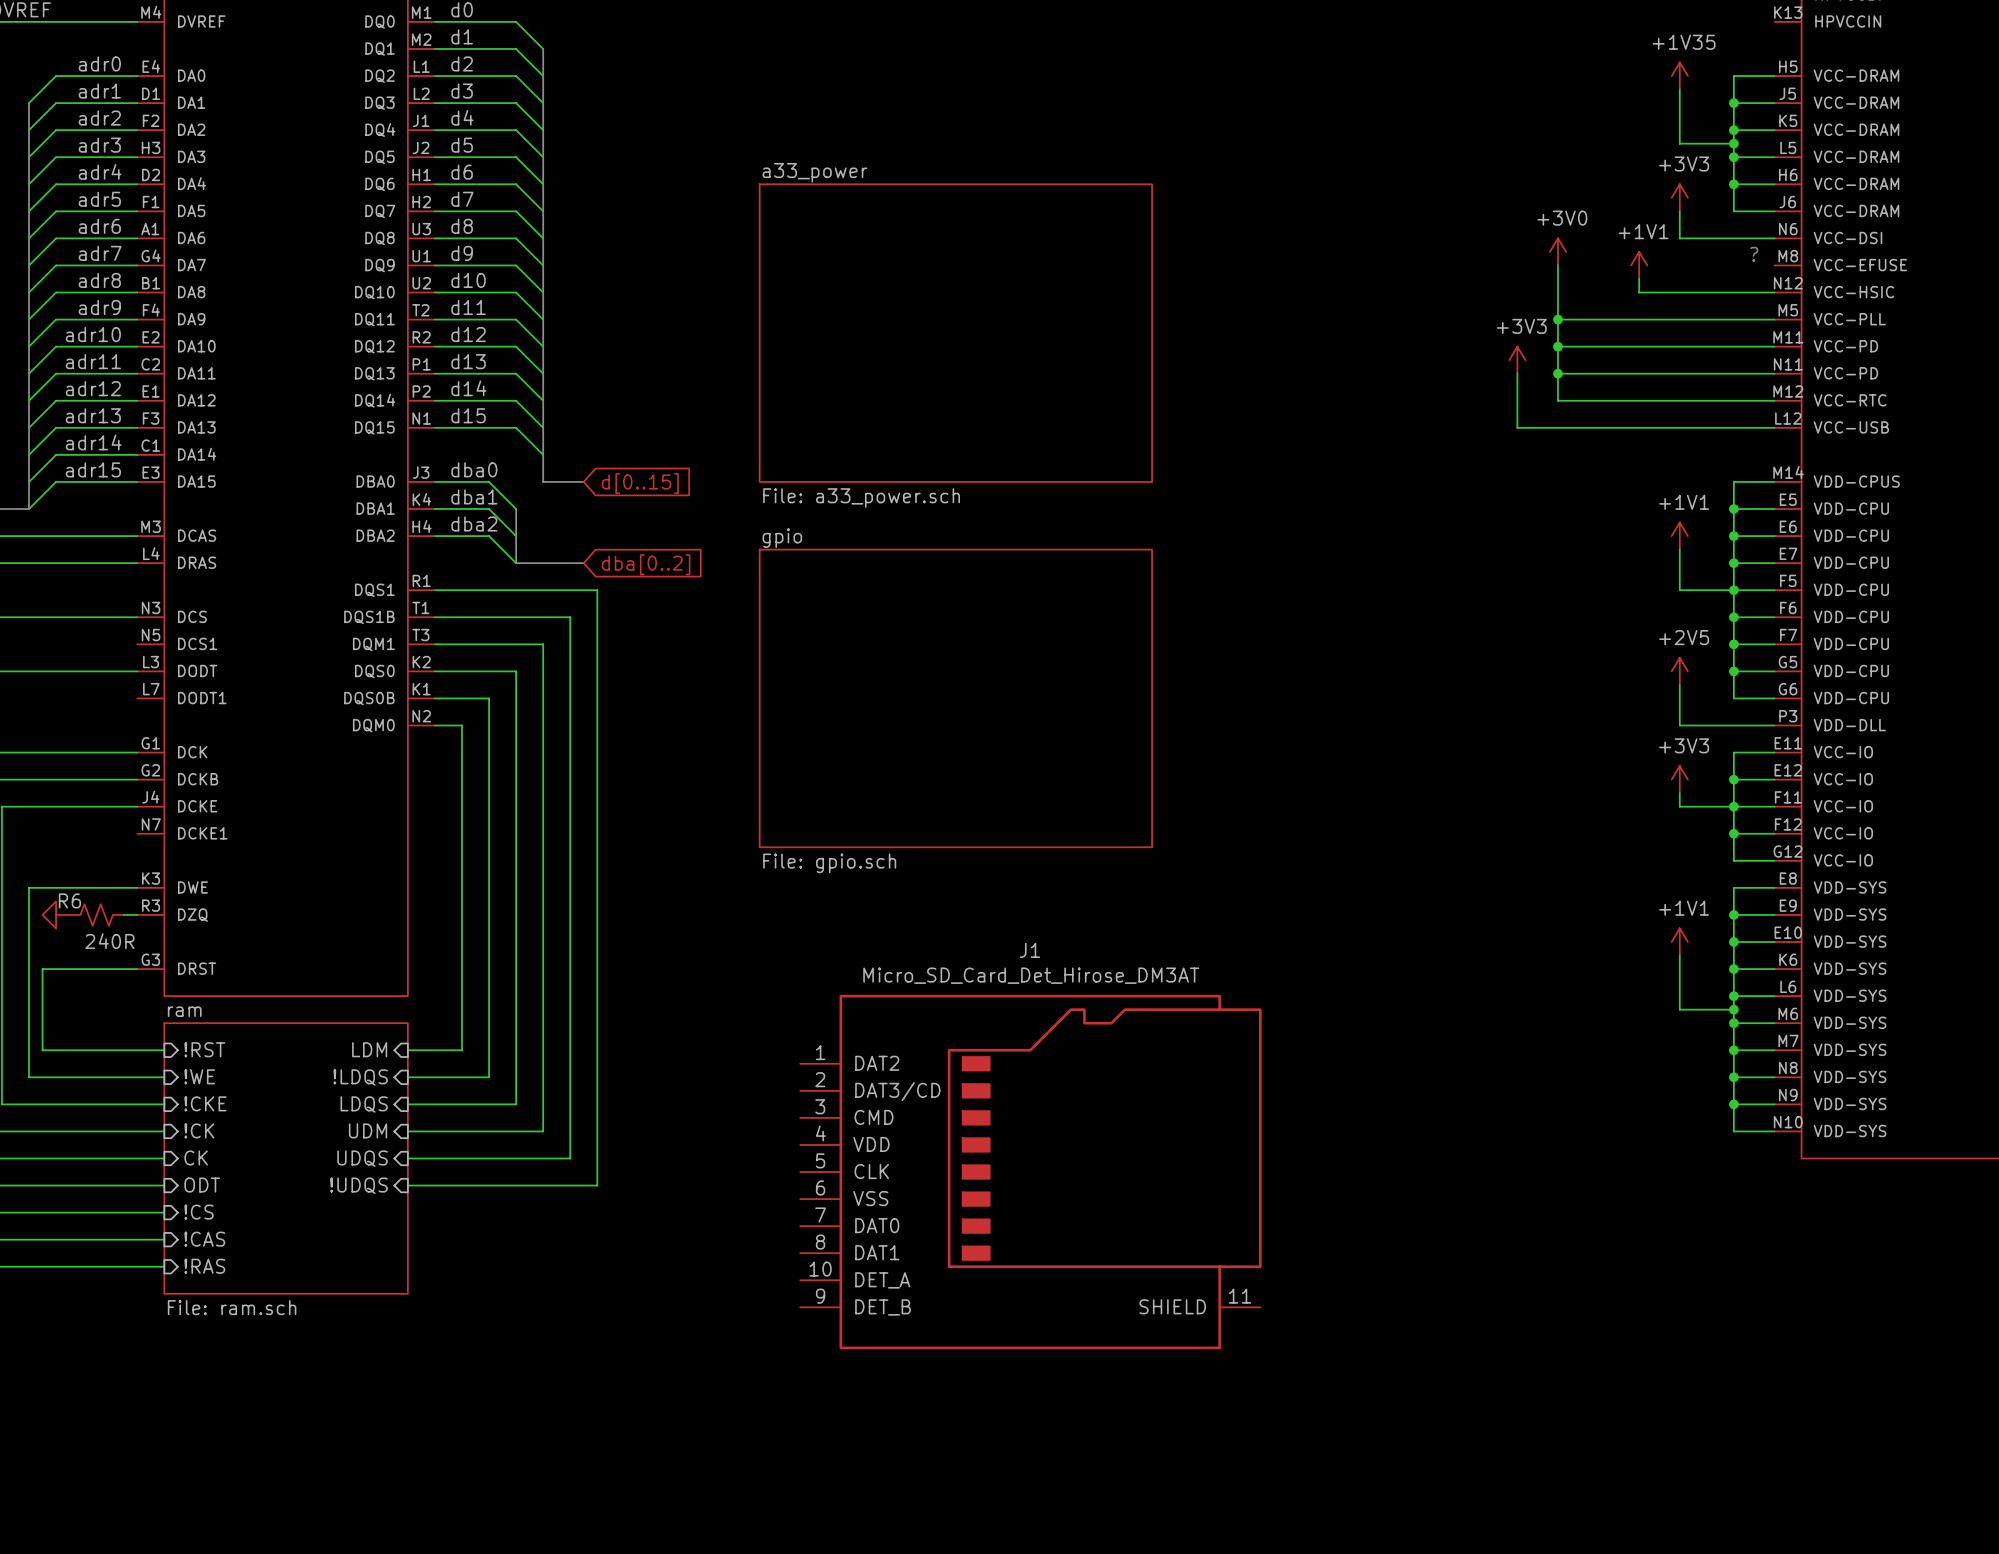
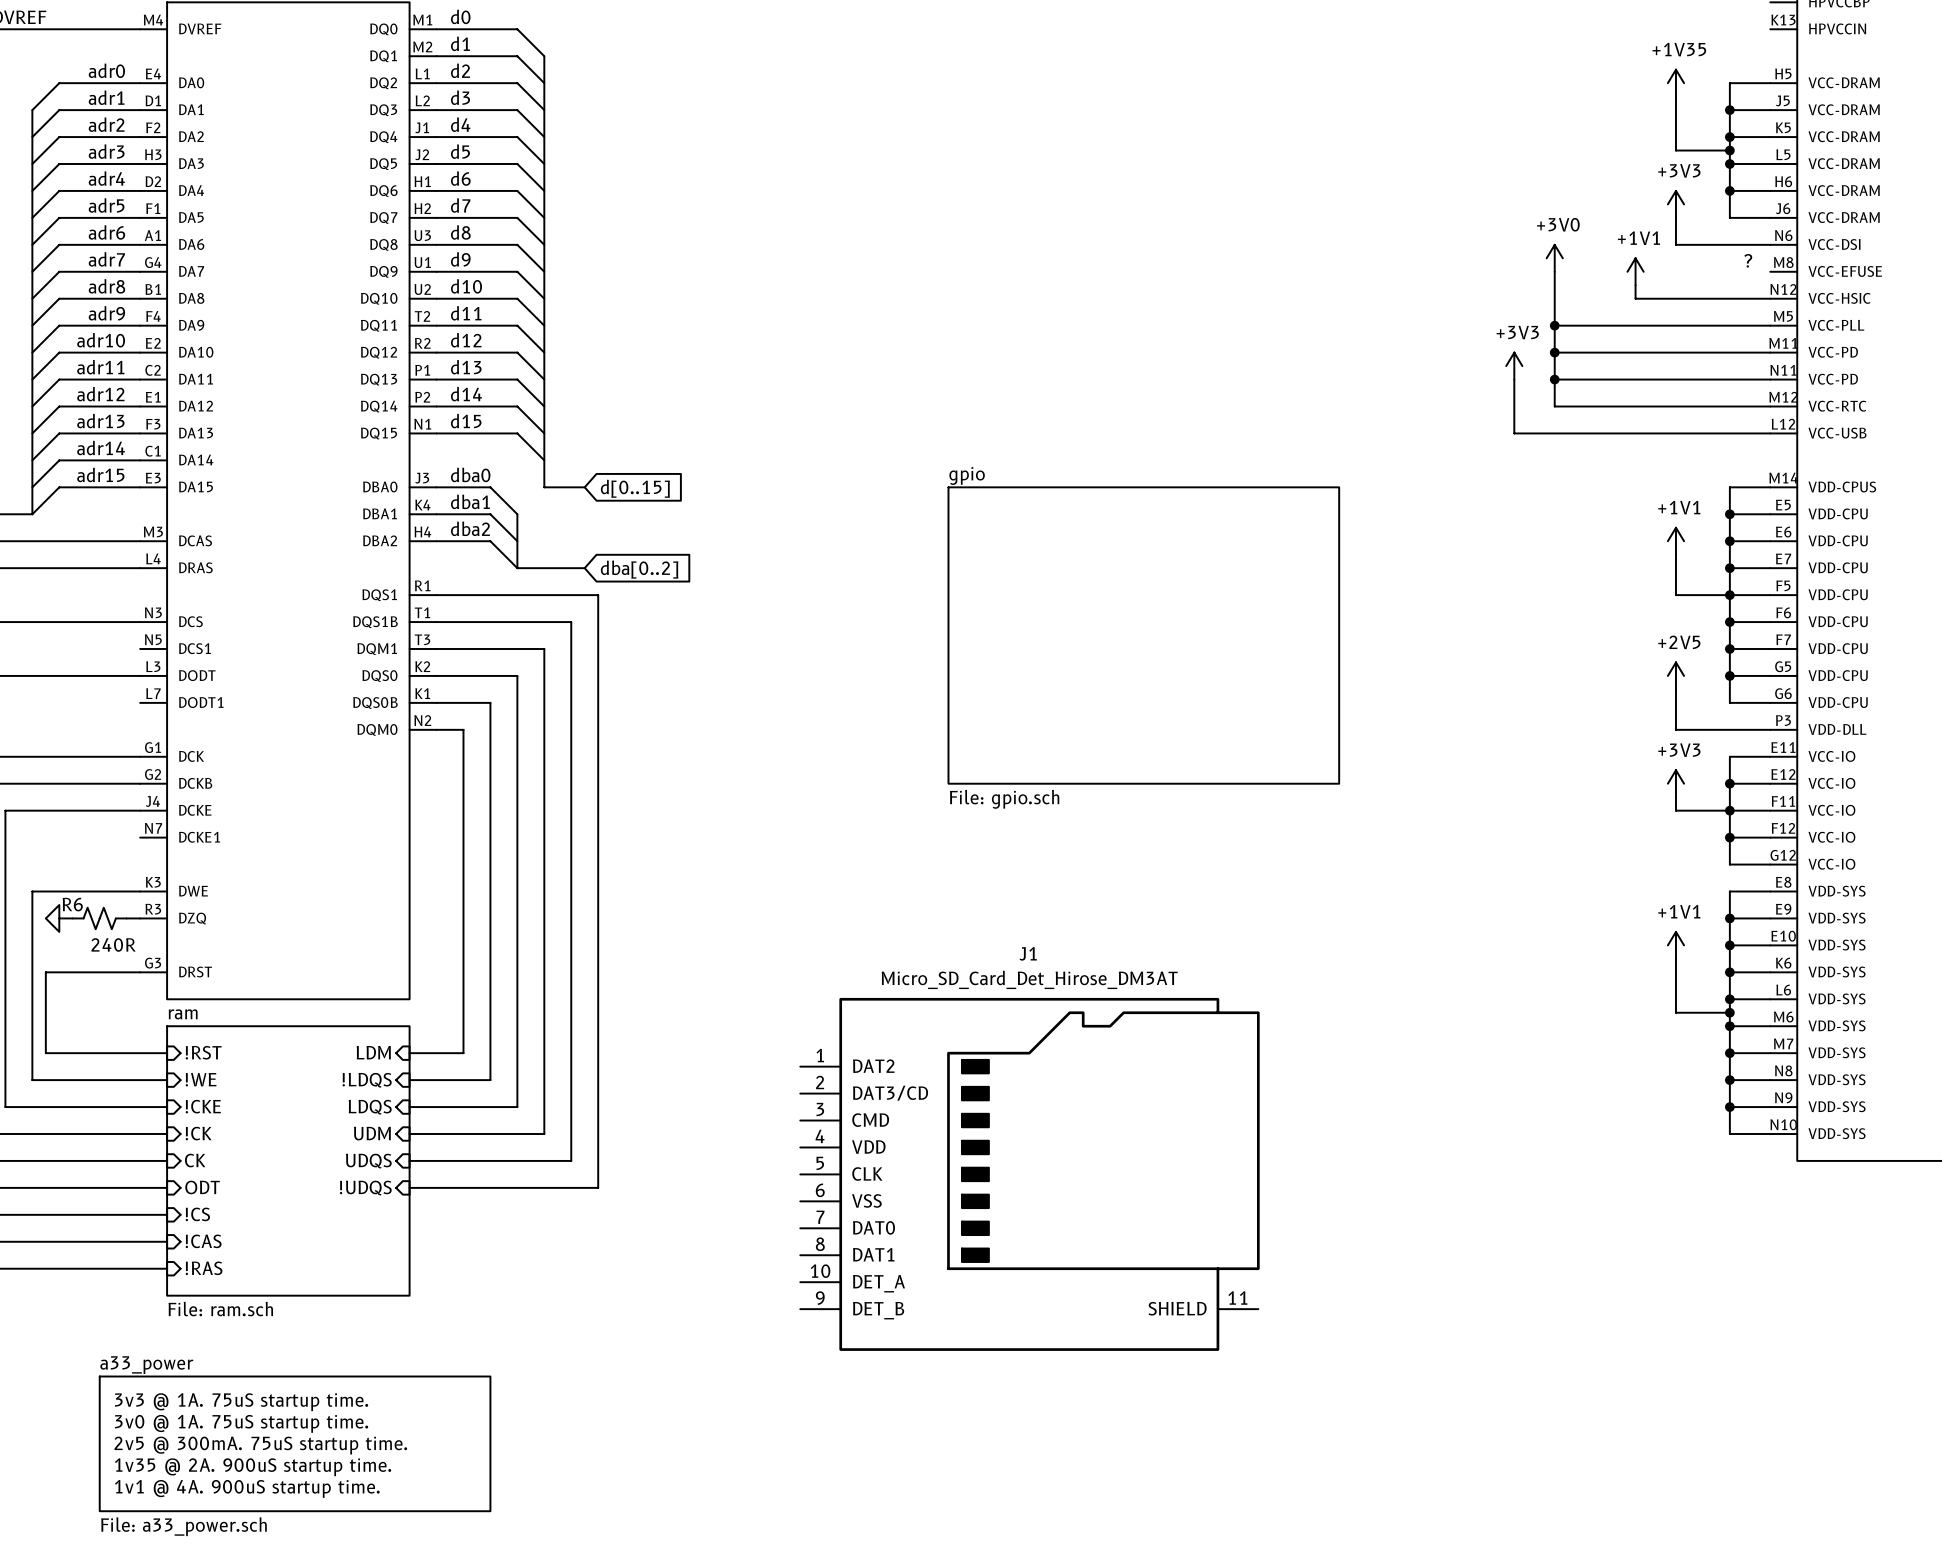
sheet a33_power name position: a33_power (814, 172) -> a33_power (146, 1365)
sheet a33_power shape: [759, 184, 1153, 482] -> [99, 1376, 491, 1512]
sheet a33_power value position: File: a33_power.sch (861, 498) -> File: a33_power.sch (183, 1526)
sheet gpio position: (955, 698) -> (1143, 635)
text: none -> 3v3 @ 1A. 75uS startup time. (241, 1402)
text: none -> 3v0 @ 1A. 75uS startup time. (241, 1423)
text: none -> 2v5 @ 300mA. 75uS startup time. (260, 1445)
text: none -> 1v35 @ 2A. 900uS startup time. (253, 1467)
text: none -> 1v1 @ 4A. 900uS startup time. (247, 1488)

